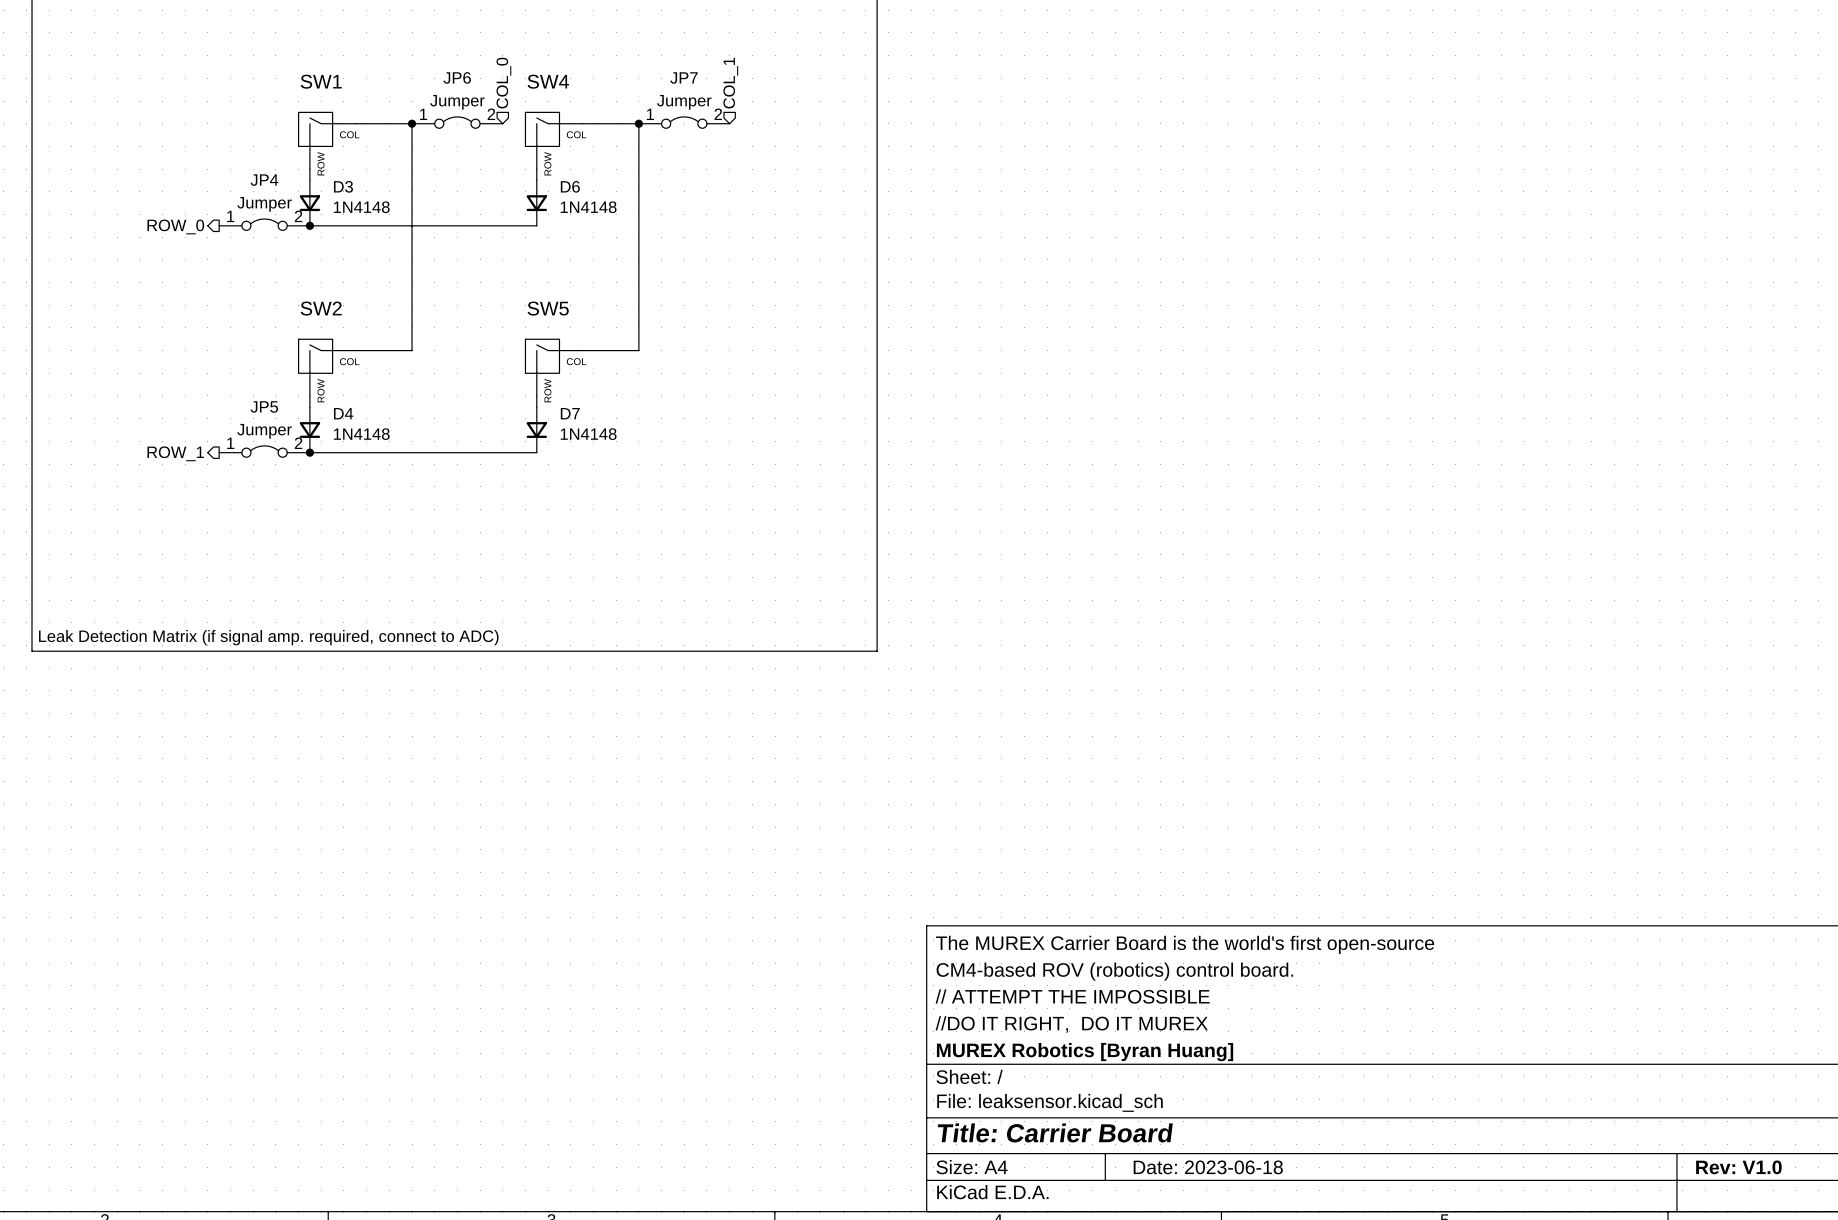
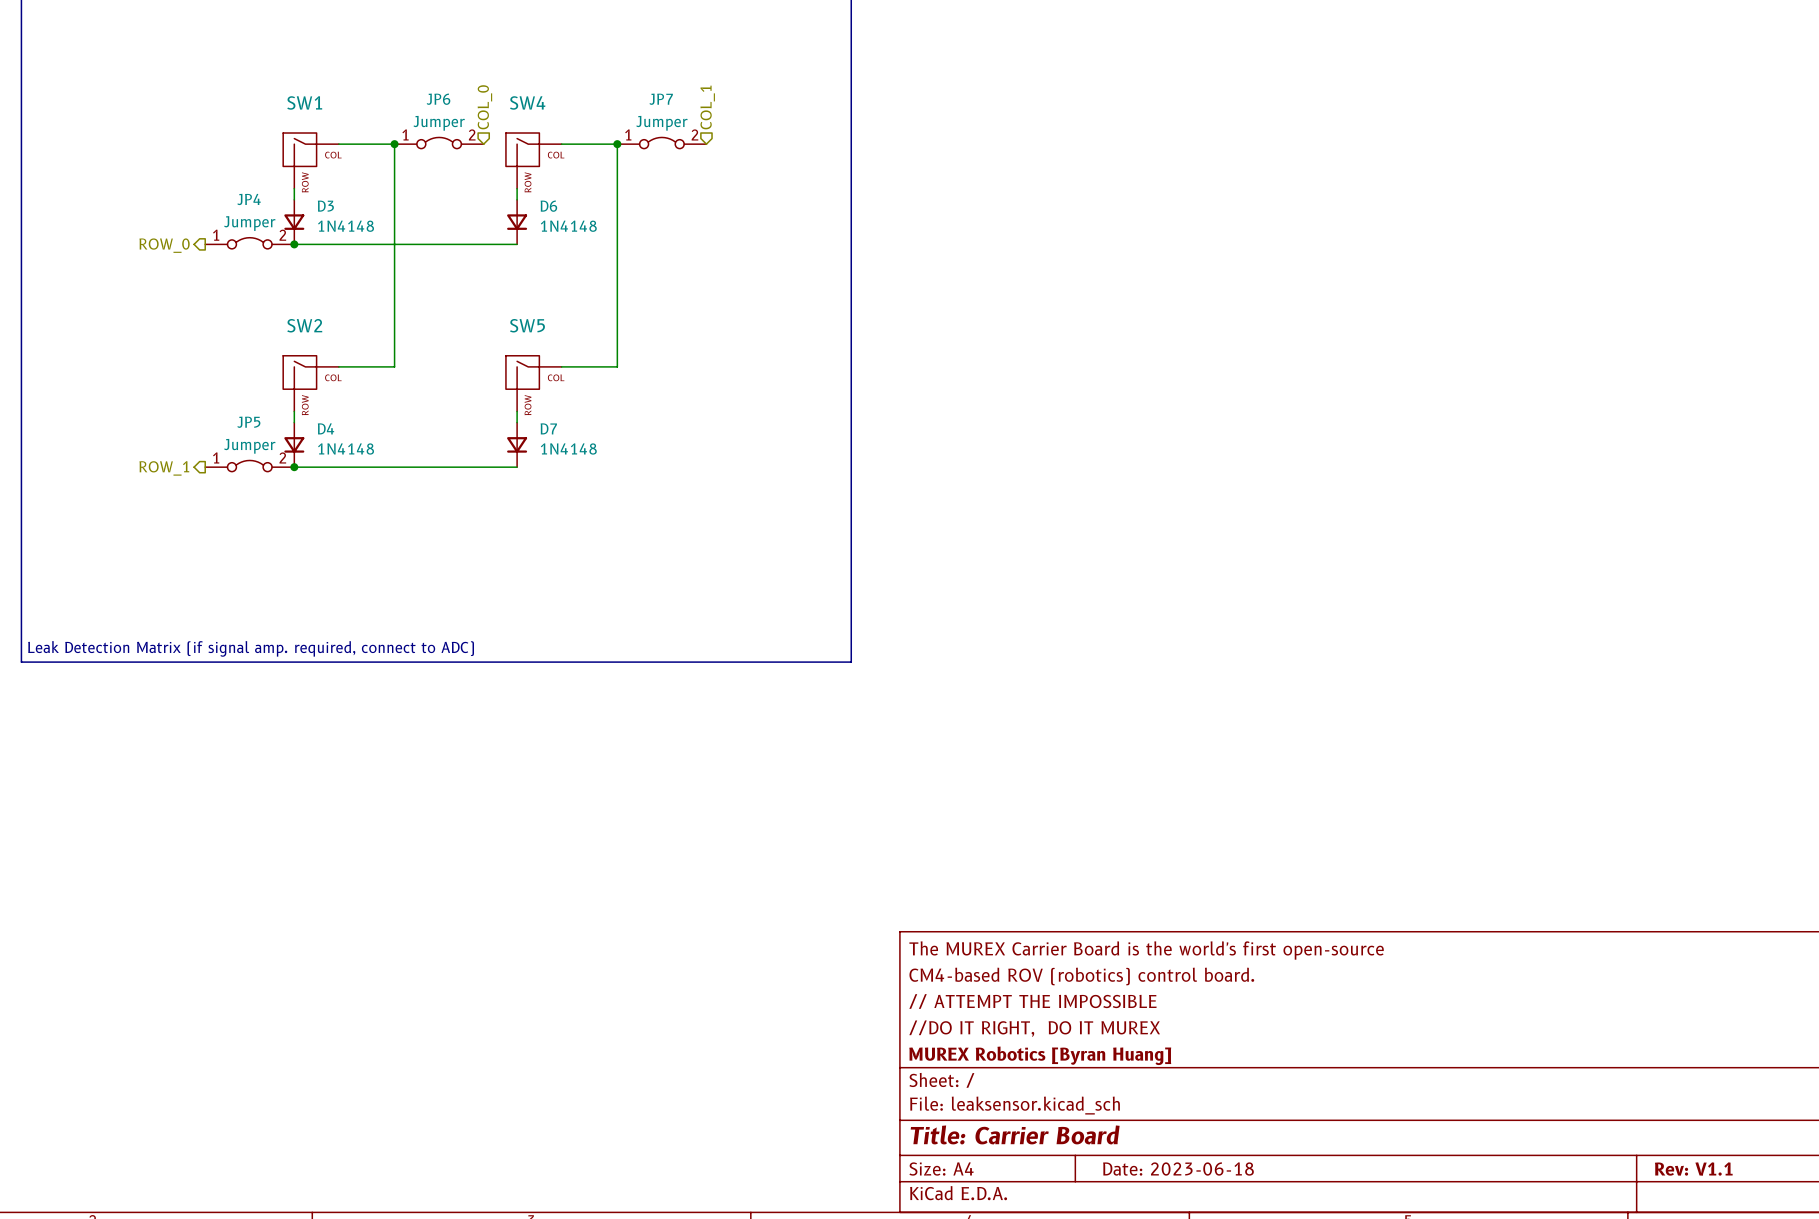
title block: Rev: V1.0 (1738, 1167) -> Rev: V1.1 (1693, 1169)

